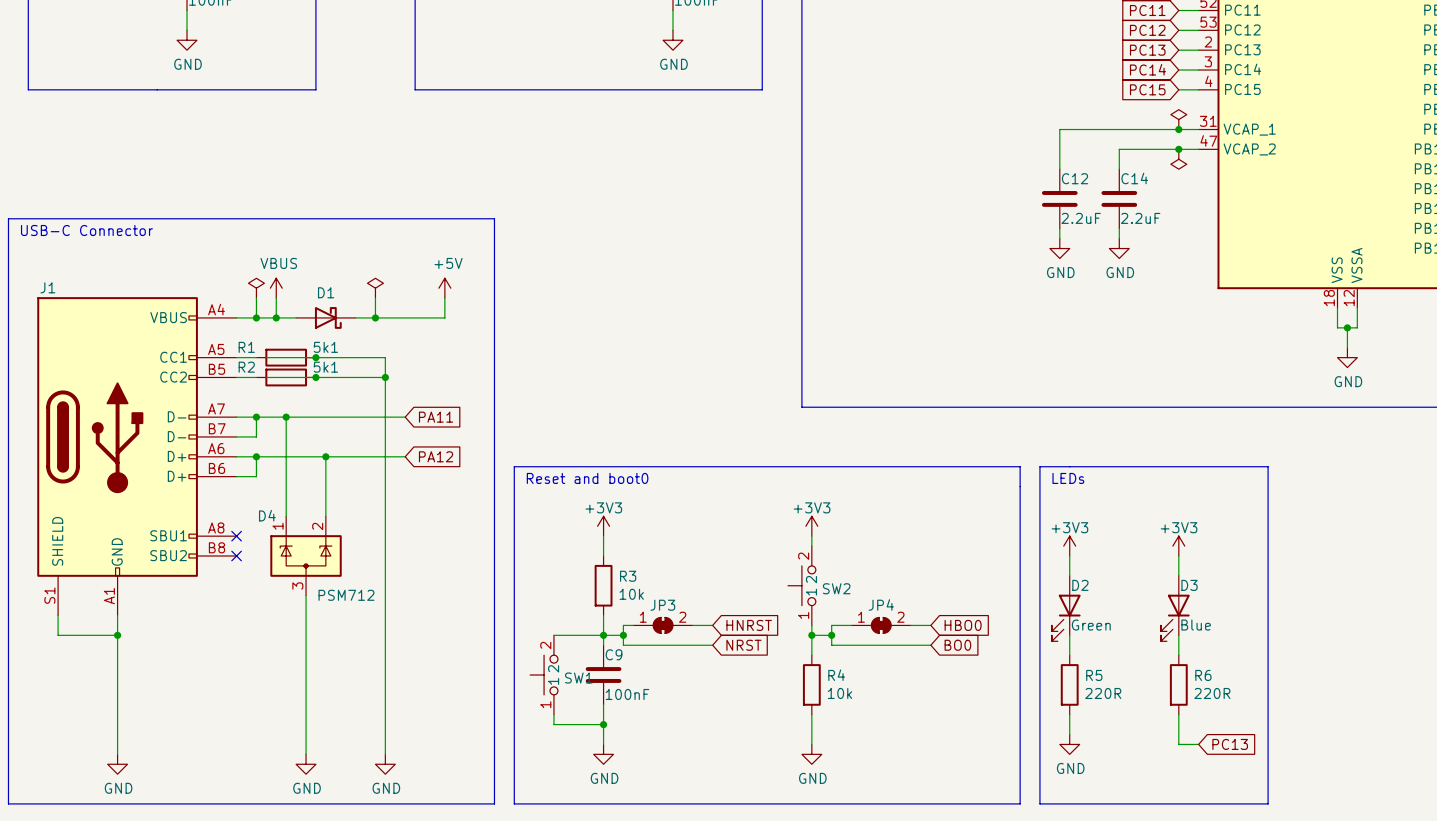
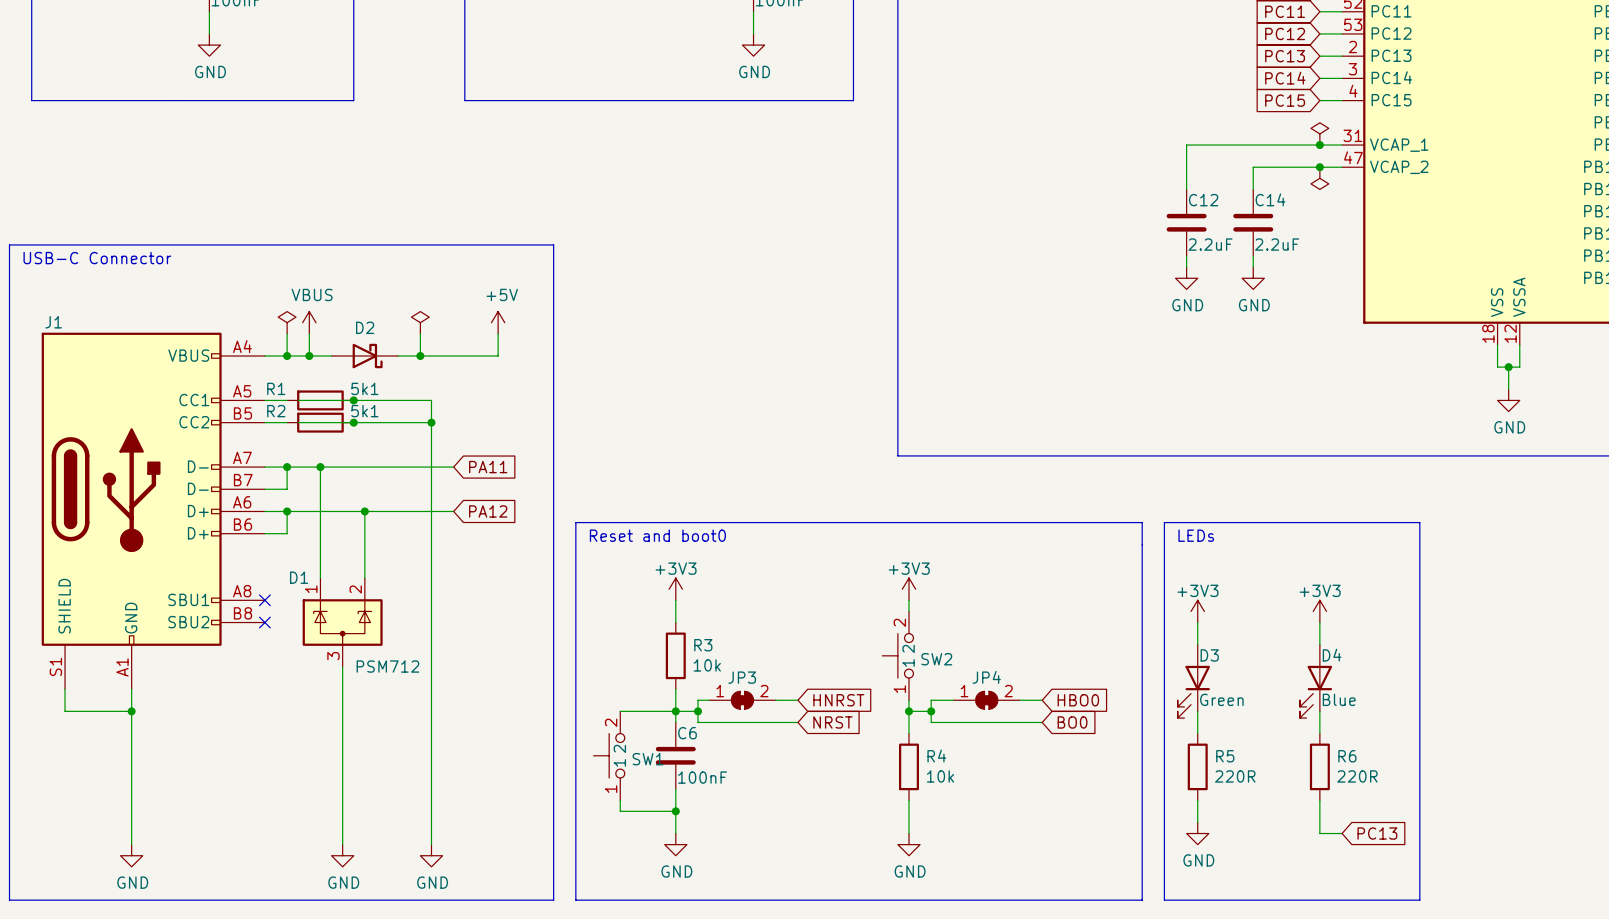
D1 name: D1 (326, 292) -> D2 (365, 327)
D4 name: D4 (267, 515) -> D1 (299, 577)
D2 name: D2 (1080, 585) -> D3 (1209, 655)
D3 name: D3 (1189, 585) -> D4 (1332, 655)
C9 name: C9 (614, 654) -> C6 (687, 733)

